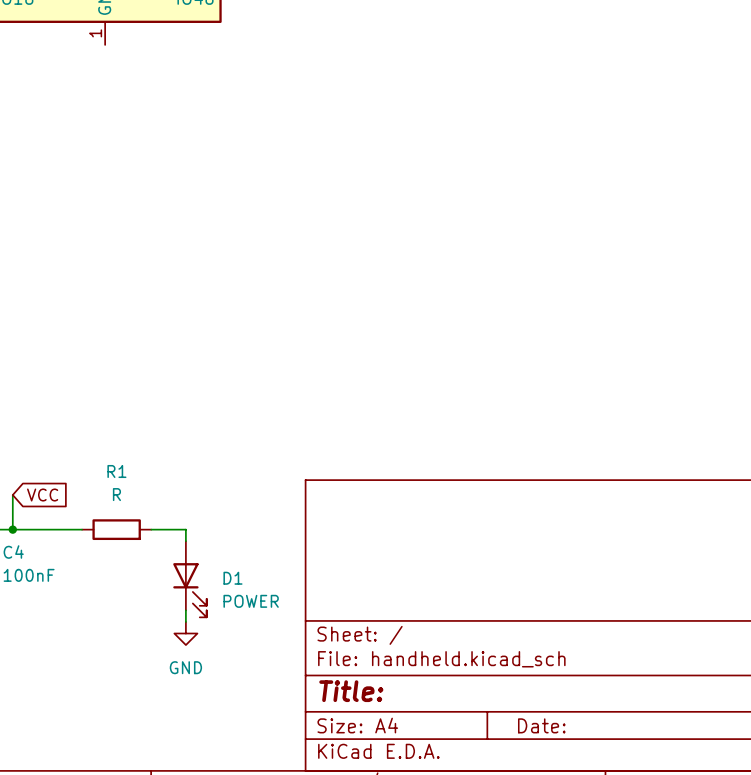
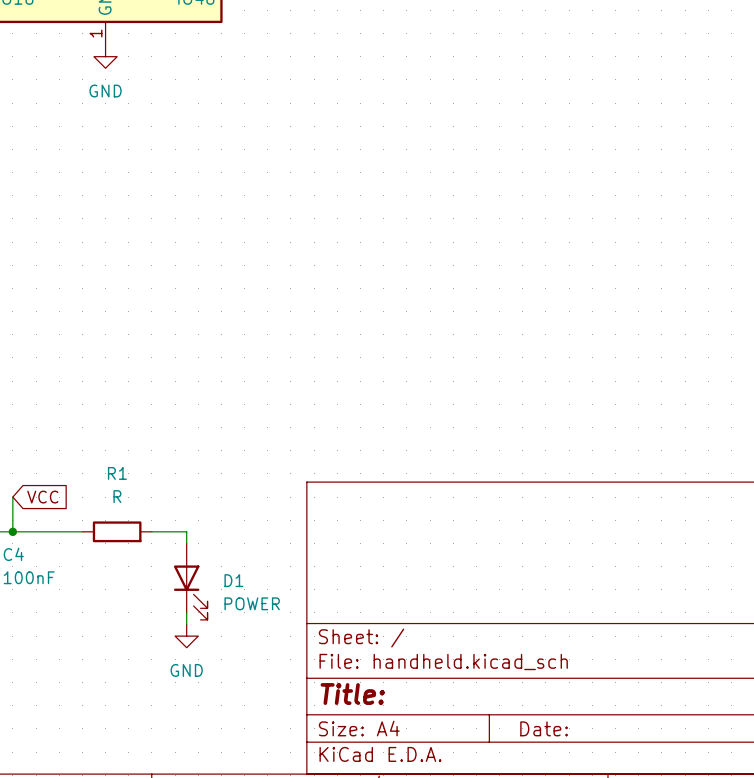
power symbol: none -> GND (105, 56)

